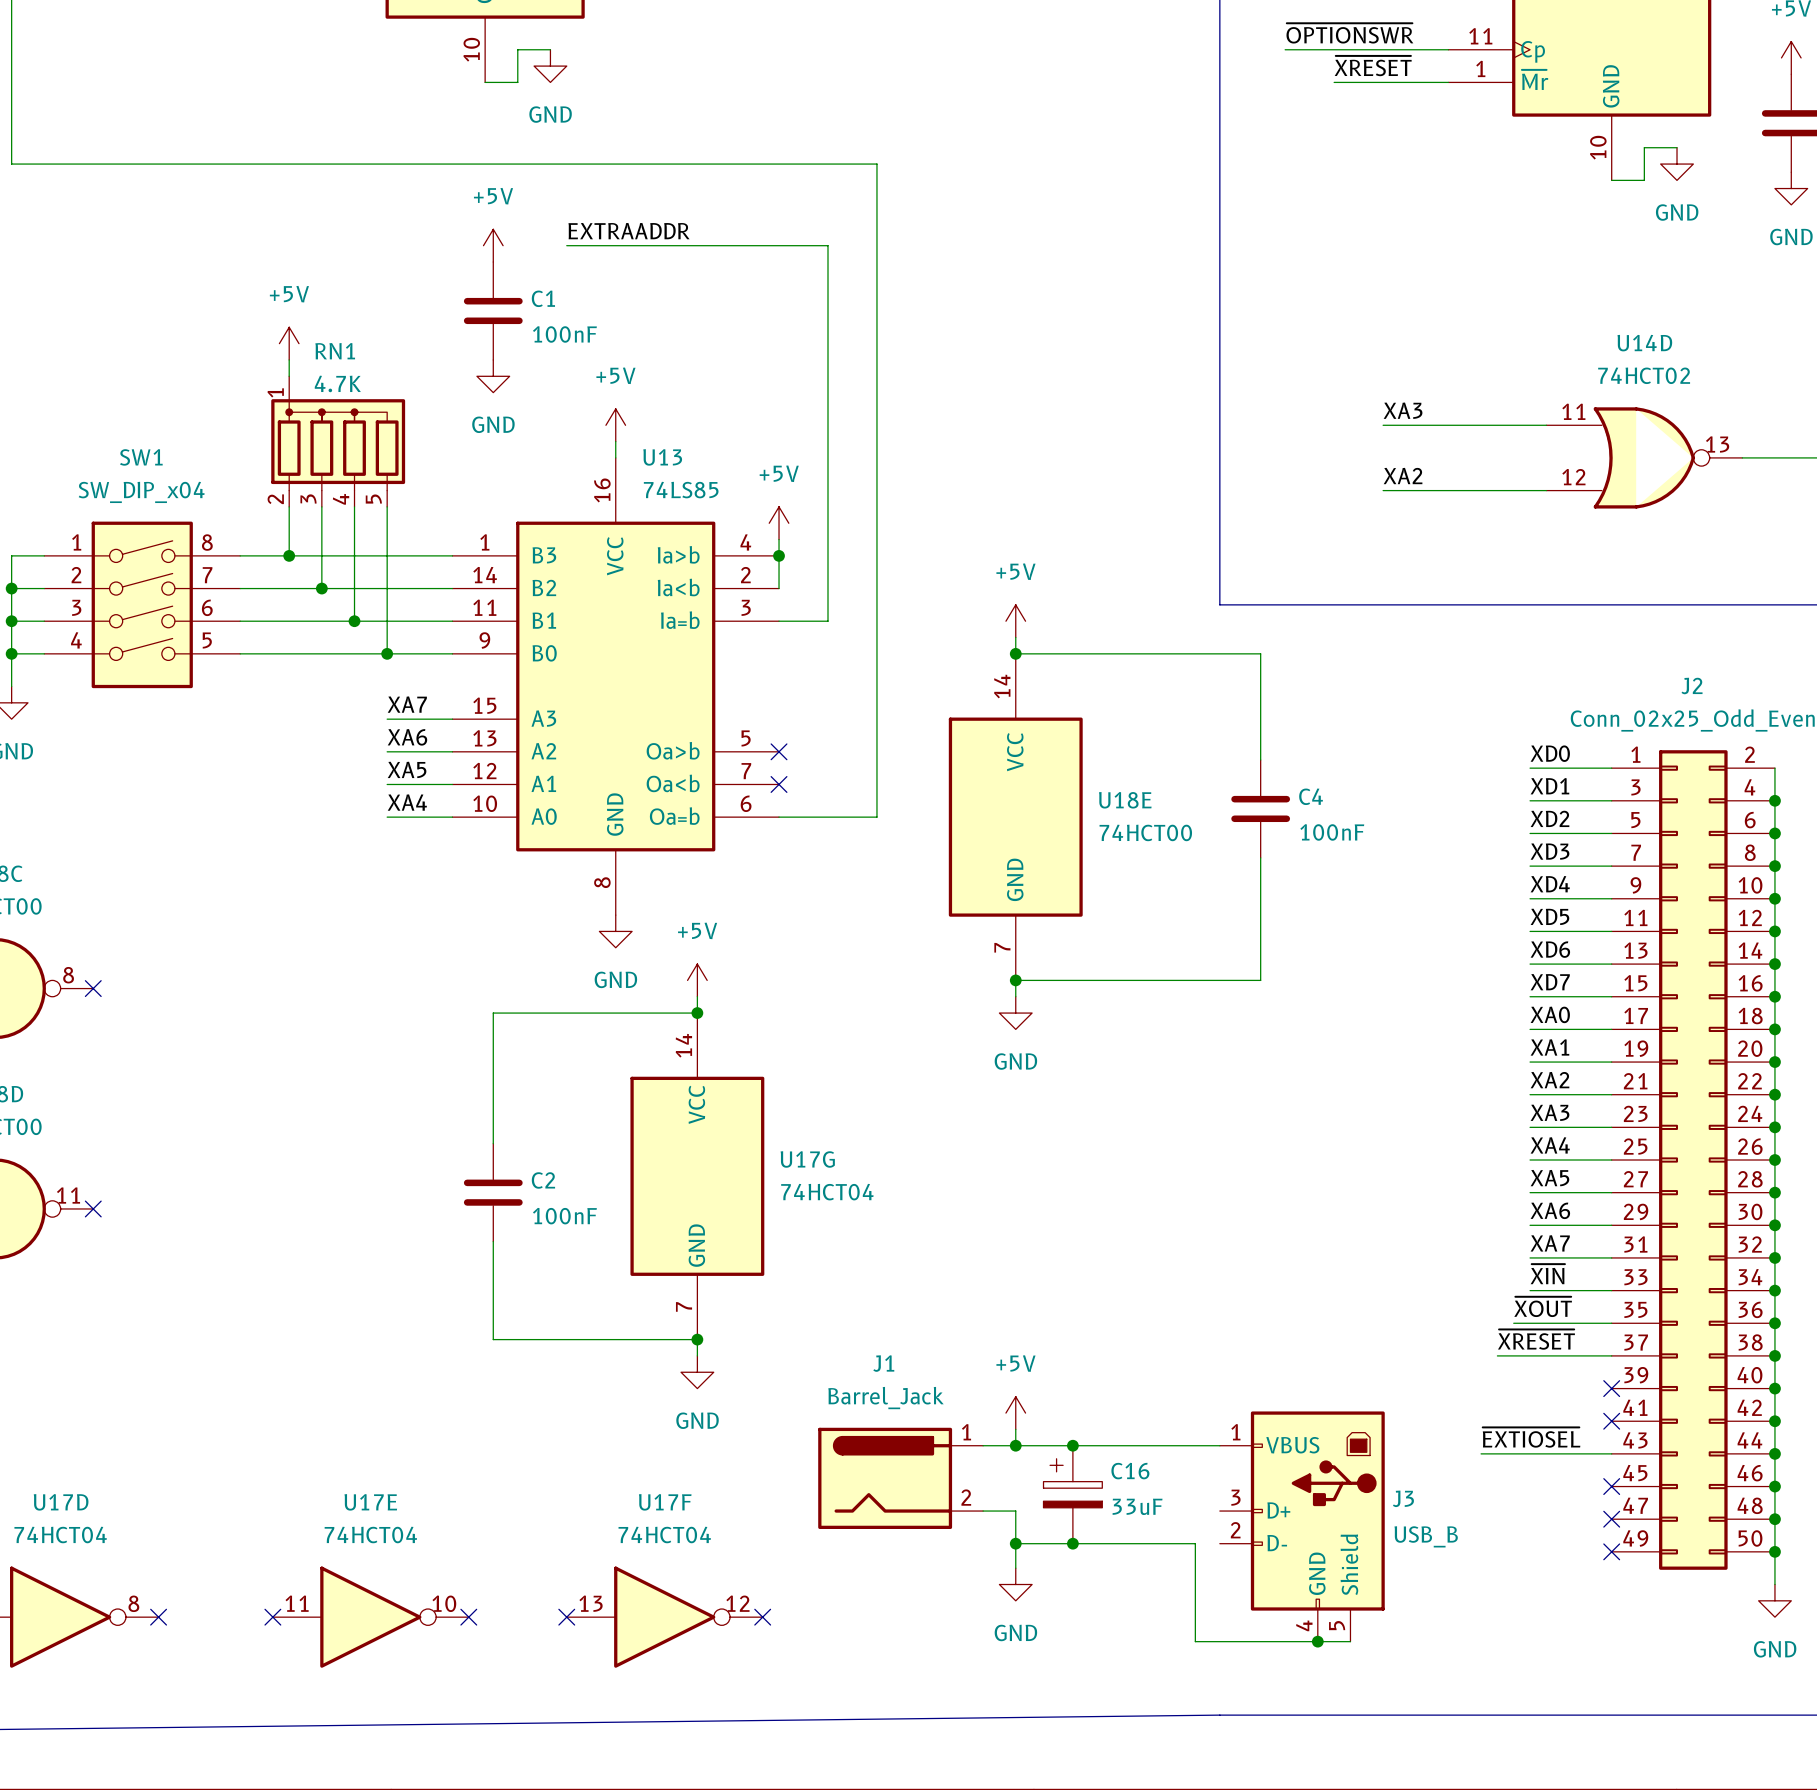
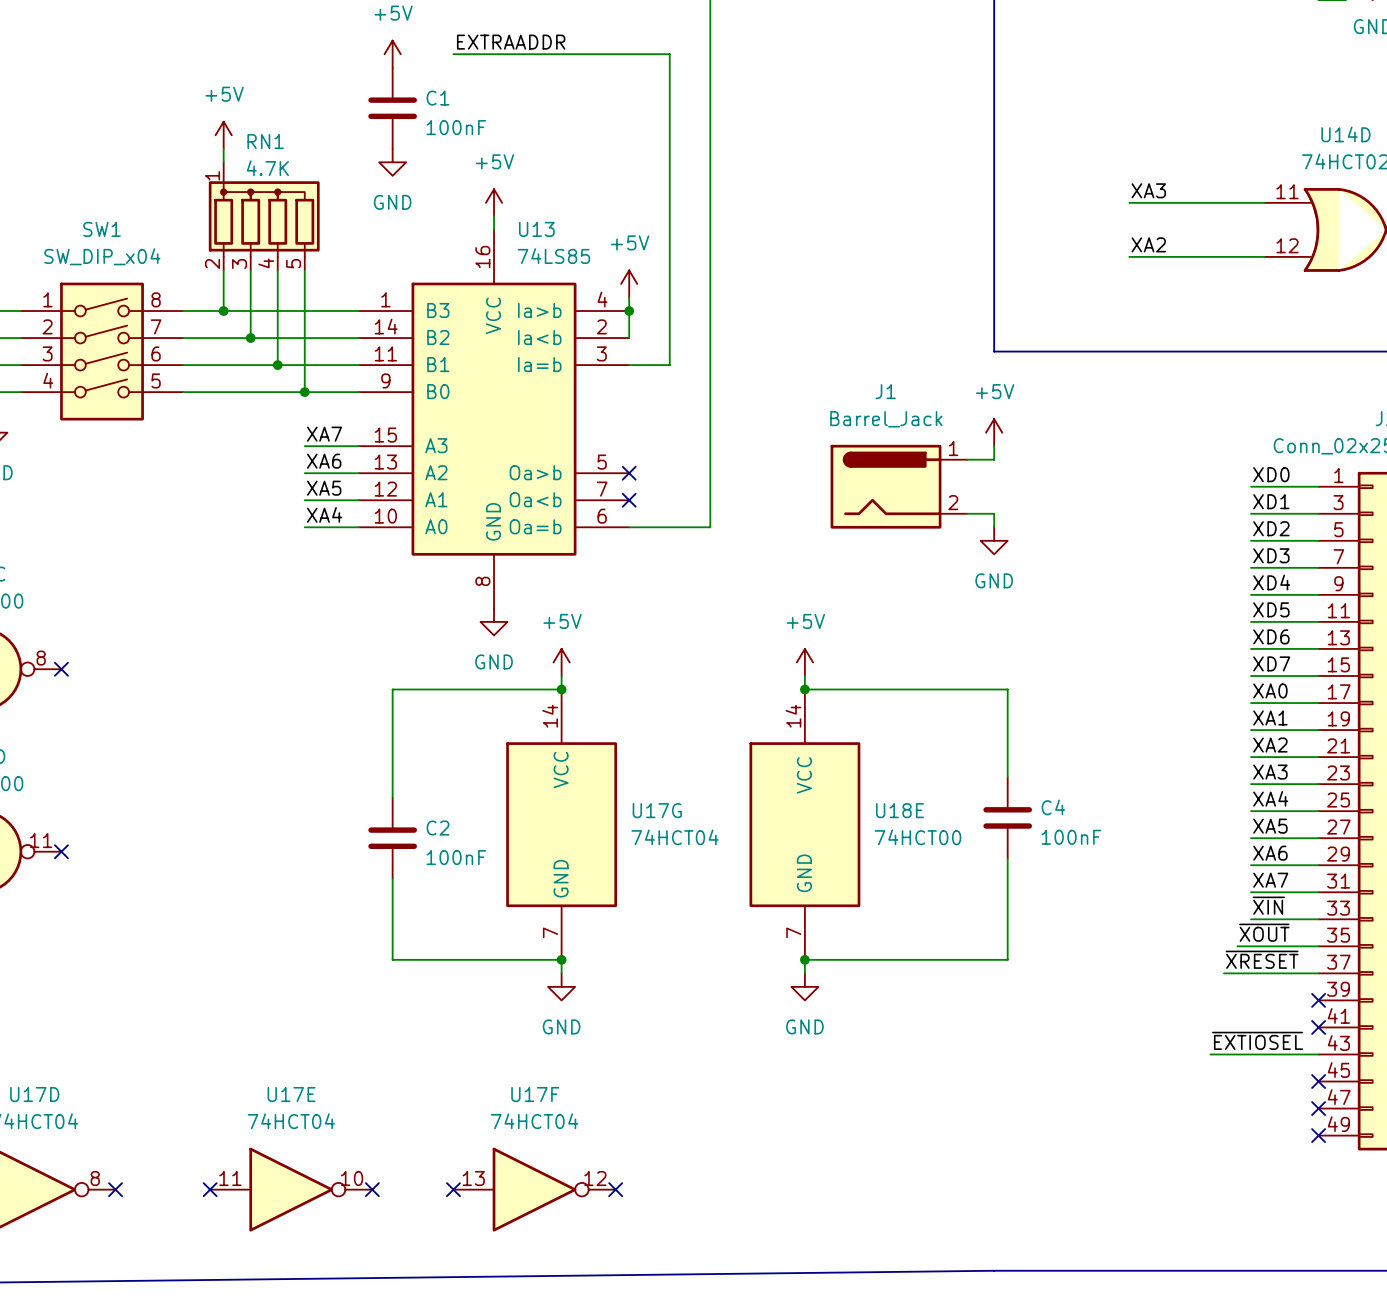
power symbol: +5V (1015, 621) -> none
wire: (1015, 637) (1015, 653) (1260, 653) (1260, 759) -> none
junction: (1015, 653) -> none
power symbol: none -> +5V (994, 432)
wire: none -> (994, 446) (994, 459) (967, 459)
wire: none -> (967, 513) (994, 513) (994, 527)
C4 position: (1260, 808) -> (1007, 817)
U18E position: (1015, 817) -> (804, 824)
power symbol: none -> GND (994, 540)
wire: (1260, 857) (1260, 980) (1015, 980) (1015, 996) -> none
power symbol: none -> +5V (804, 662)
junction position: (1015, 980) -> (804, 689)
wire: none -> (804, 675) (804, 689) (1007, 689) (1007, 777)
power symbol: GND (1015, 1013) -> none
wire: none -> (1007, 858) (1007, 959) (804, 959) (804, 973)
junction: none -> (804, 959)
power symbol: none -> GND (804, 986)
power symbol: +5V (1015, 1413) -> none
wire: (1015, 1429) (1015, 1445) -> none
wire: (983, 1445) (1219, 1445) -> none
junction: (1015, 1445) -> none
junction: (1072, 1445) -> none
J1 position: (900, 1478) -> (898, 486)
C16: 33uF (1072, 1494) -> none
wire: (983, 1511) (1015, 1511) (1015, 1568) -> none
J3: USB_B (1302, 1526) -> none
wire: (1015, 1543) (1195, 1543) (1195, 1641) (1350, 1641) -> none
junction: (1015, 1543) -> none
junction: (1072, 1543) -> none
power symbol: GND (1015, 1584) -> none
junction: (1317, 1641) -> none

